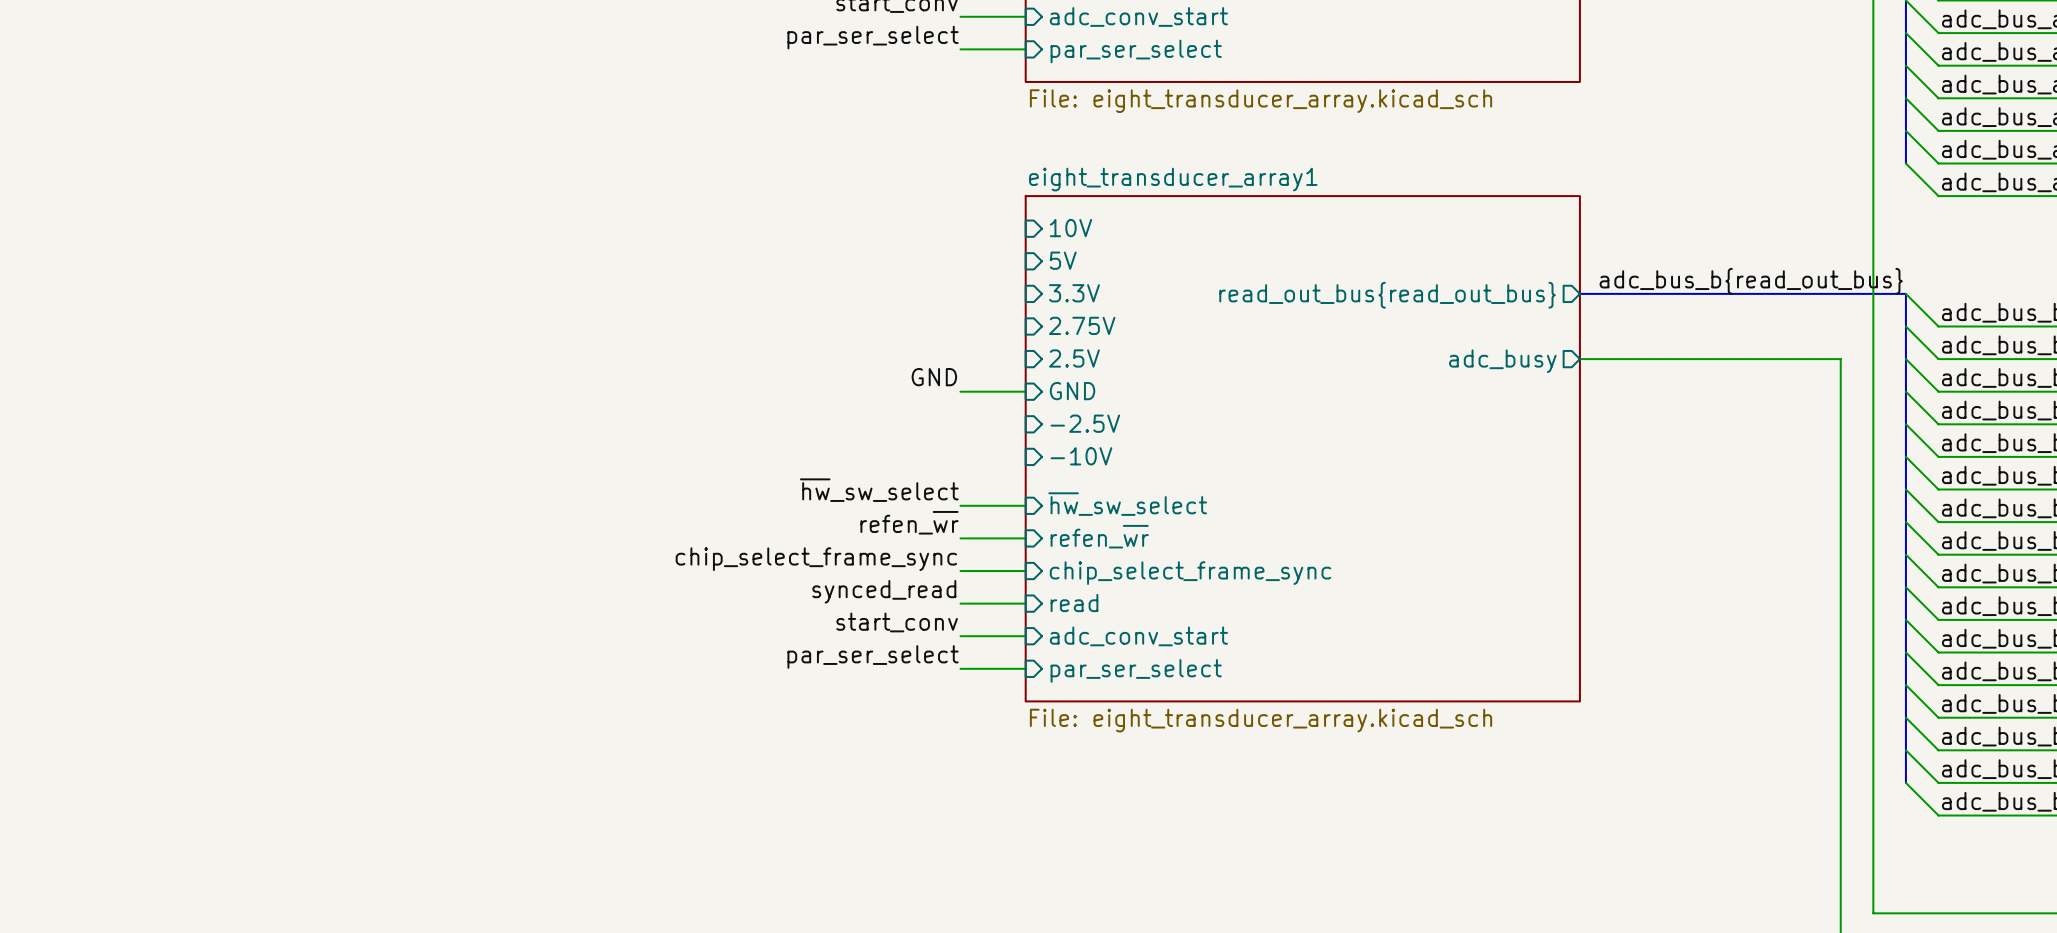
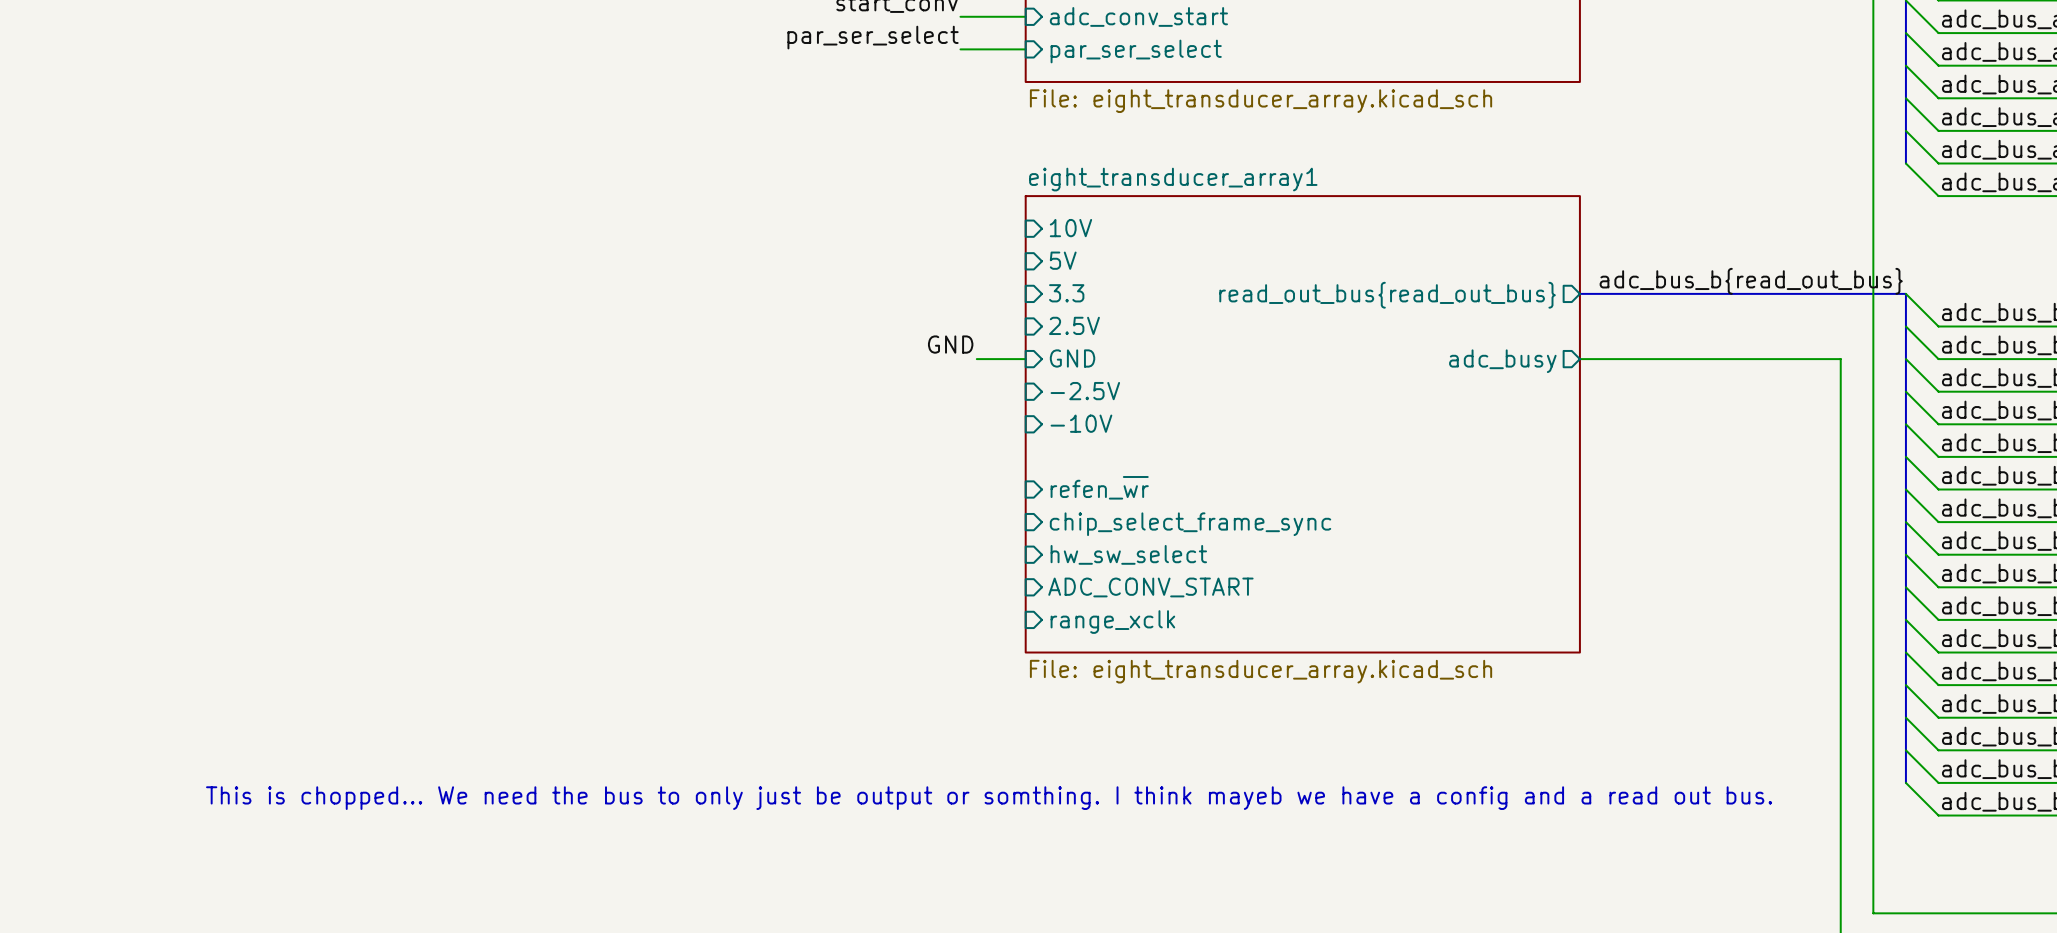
sheet eight_transducer_array1 shape: [1024, 195, 1581, 703] -> [1024, 195, 1581, 654]
sheet pin: 3.3V (1074, 293) -> 3.3 (1066, 293)
sheet pin: 2.75V (1082, 325) -> 2.5V (1074, 325)
sheet pin: 2.5V (1074, 358) -> GND (1072, 358)
wire: none -> (976, 359) (1025, 359)
label position: GND (934, 377) -> GND (950, 344)
wire: (960, 391) (1025, 391) -> none
sheet pin: GND (1072, 391) -> -2.5V (1085, 391)
sheet pin: -2.5V (1085, 423) -> -10V (1081, 423)
sheet pin: -10V (1081, 456) -> none
label: ~{hw}_sw_select (879, 490) -> none
sheet pin: ~{hw}_sw_select (1127, 504) -> none
wire: (960, 505) (1025, 505) -> none
label: refen_~{wr} (909, 522) -> none
sheet pin position: refen_~{wr} (1099, 536) -> refen_~{wr} (1099, 487)
wire: (960, 538) (1025, 538) -> none
sheet pin: none -> hw_sw_select (1128, 554)
label: chip_select_frame_sync (816, 559) -> none
wire: (960, 571) (1025, 571) -> none
sheet pin position: chip_select_frame_sync (1190, 573) -> chip_select_frame_sync (1190, 524)
sheet pin: none -> ADC_CONV_START (1150, 587)
label: synced_read (884, 591) -> none
wire: (960, 603) (1025, 603) -> none
sheet pin: read (1074, 603) -> none
label: start_conv (897, 622) -> none
sheet pin: none -> range_xclk (1112, 622)
wire: (960, 636) (1025, 636) -> none
sheet pin: adc_conv_start (1138, 636) -> none
label: par_ser_select (873, 656) -> none
wire: (960, 668) (1025, 668) -> none
sheet pin: par_ser_select (1136, 670) -> none
text: none -> This is chopped... We need the bus to only just be output or somthing. I think mayeb we have a config and a read out bus. (989, 798)

